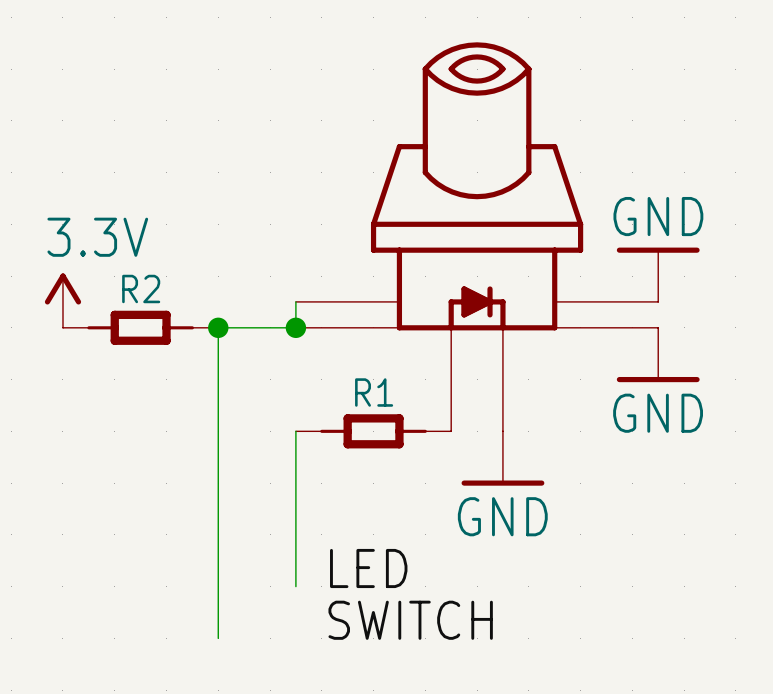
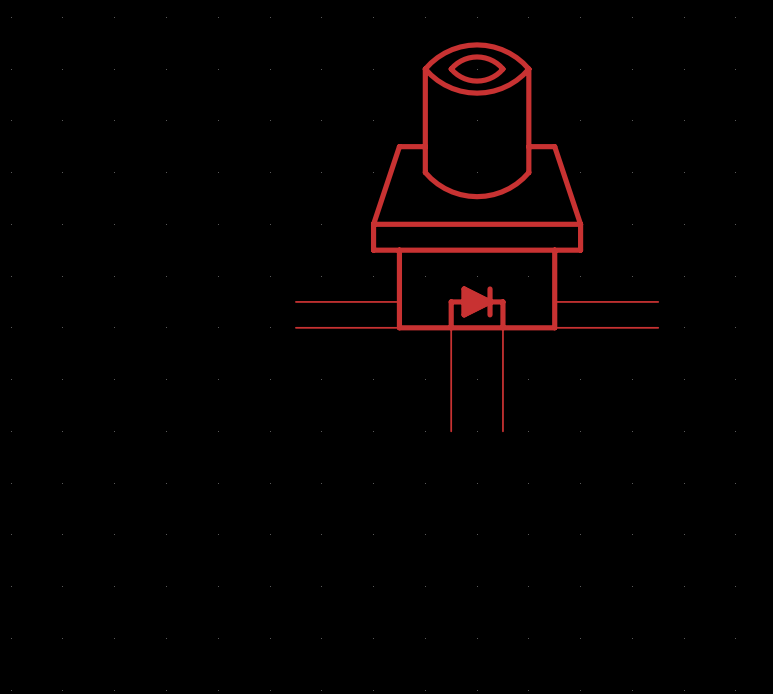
power symbol: GND (658, 274) -> none
power symbol: 3.3V (62, 300) -> none
wire: (295, 301) (295, 327) (218, 327) (218, 638) -> none
R2: (140, 327) -> none
junction: (218, 327) -> none
junction: (295, 327) -> none
power symbol: GND (658, 354) -> none
wire: (295, 431) (295, 586) -> none
R1: (373, 431) -> none
power symbol: GND (502, 458) -> none
label: LED (368, 568) -> none
label: SWITCH (410, 620) -> none

